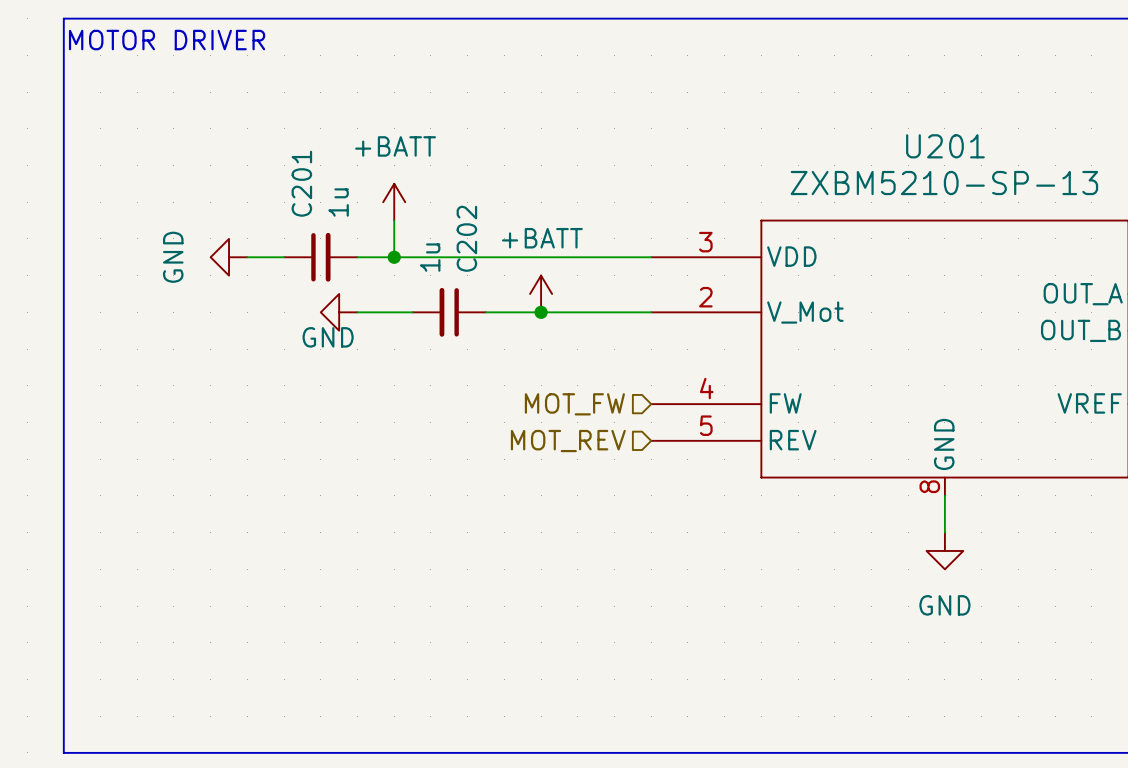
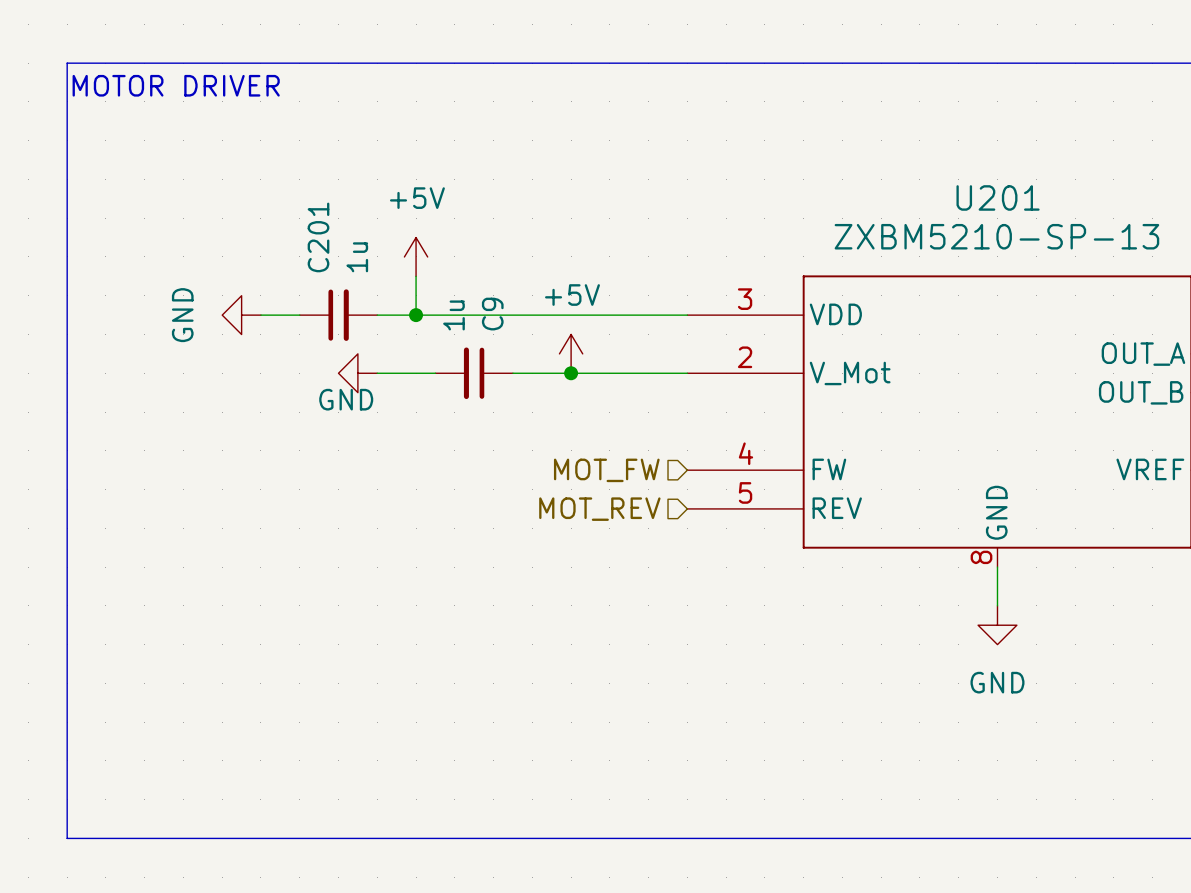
power symbol: +BATT (394, 202) -> +5V (416, 256)
C202 name: C202 (466, 238) -> C9 (492, 314)
power symbol: +BATT (541, 293) -> +5V (571, 353)

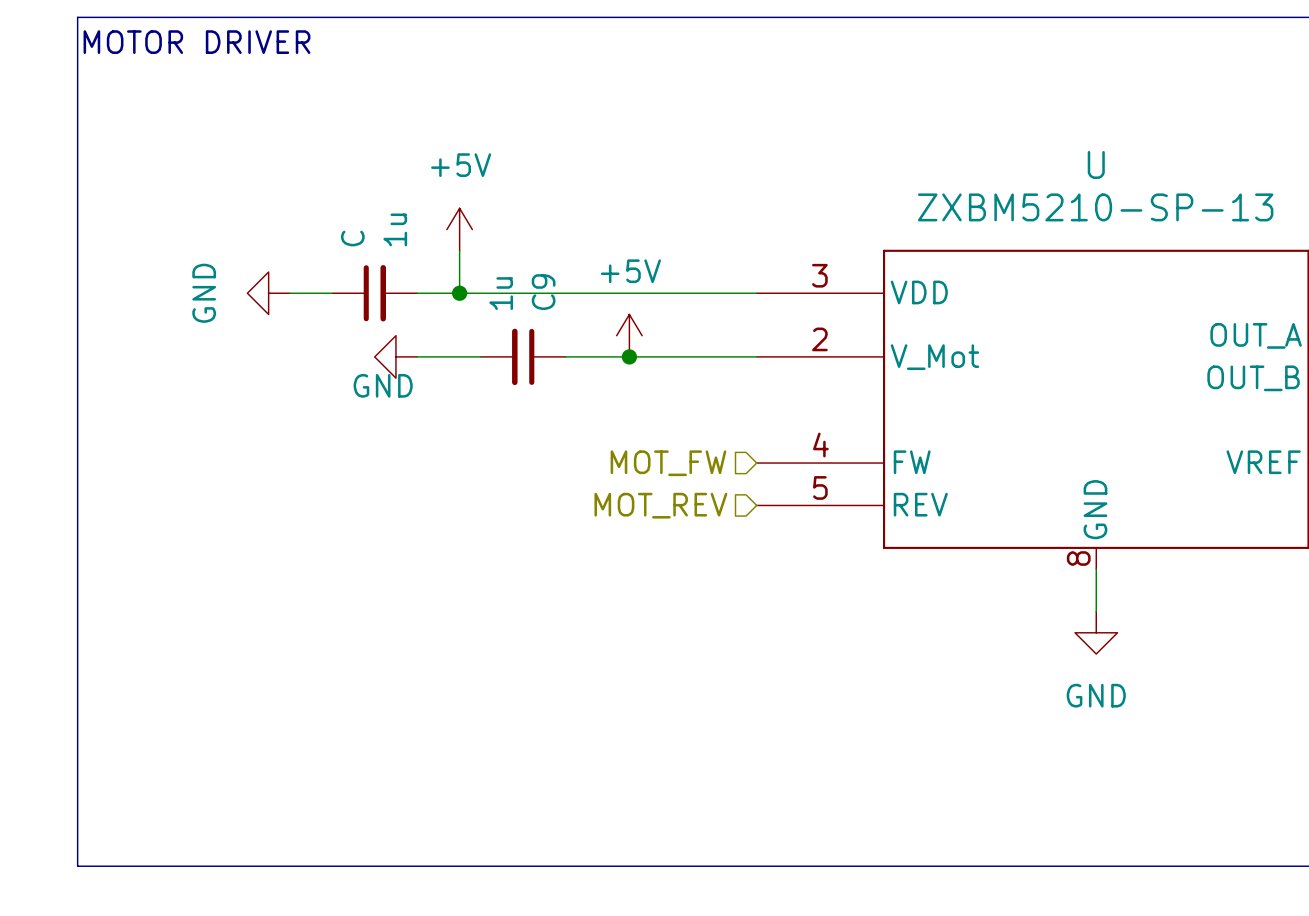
U201 name: U201 (998, 197) -> U (1096, 164)
C201 name: C201 (318, 237) -> C (352, 238)

